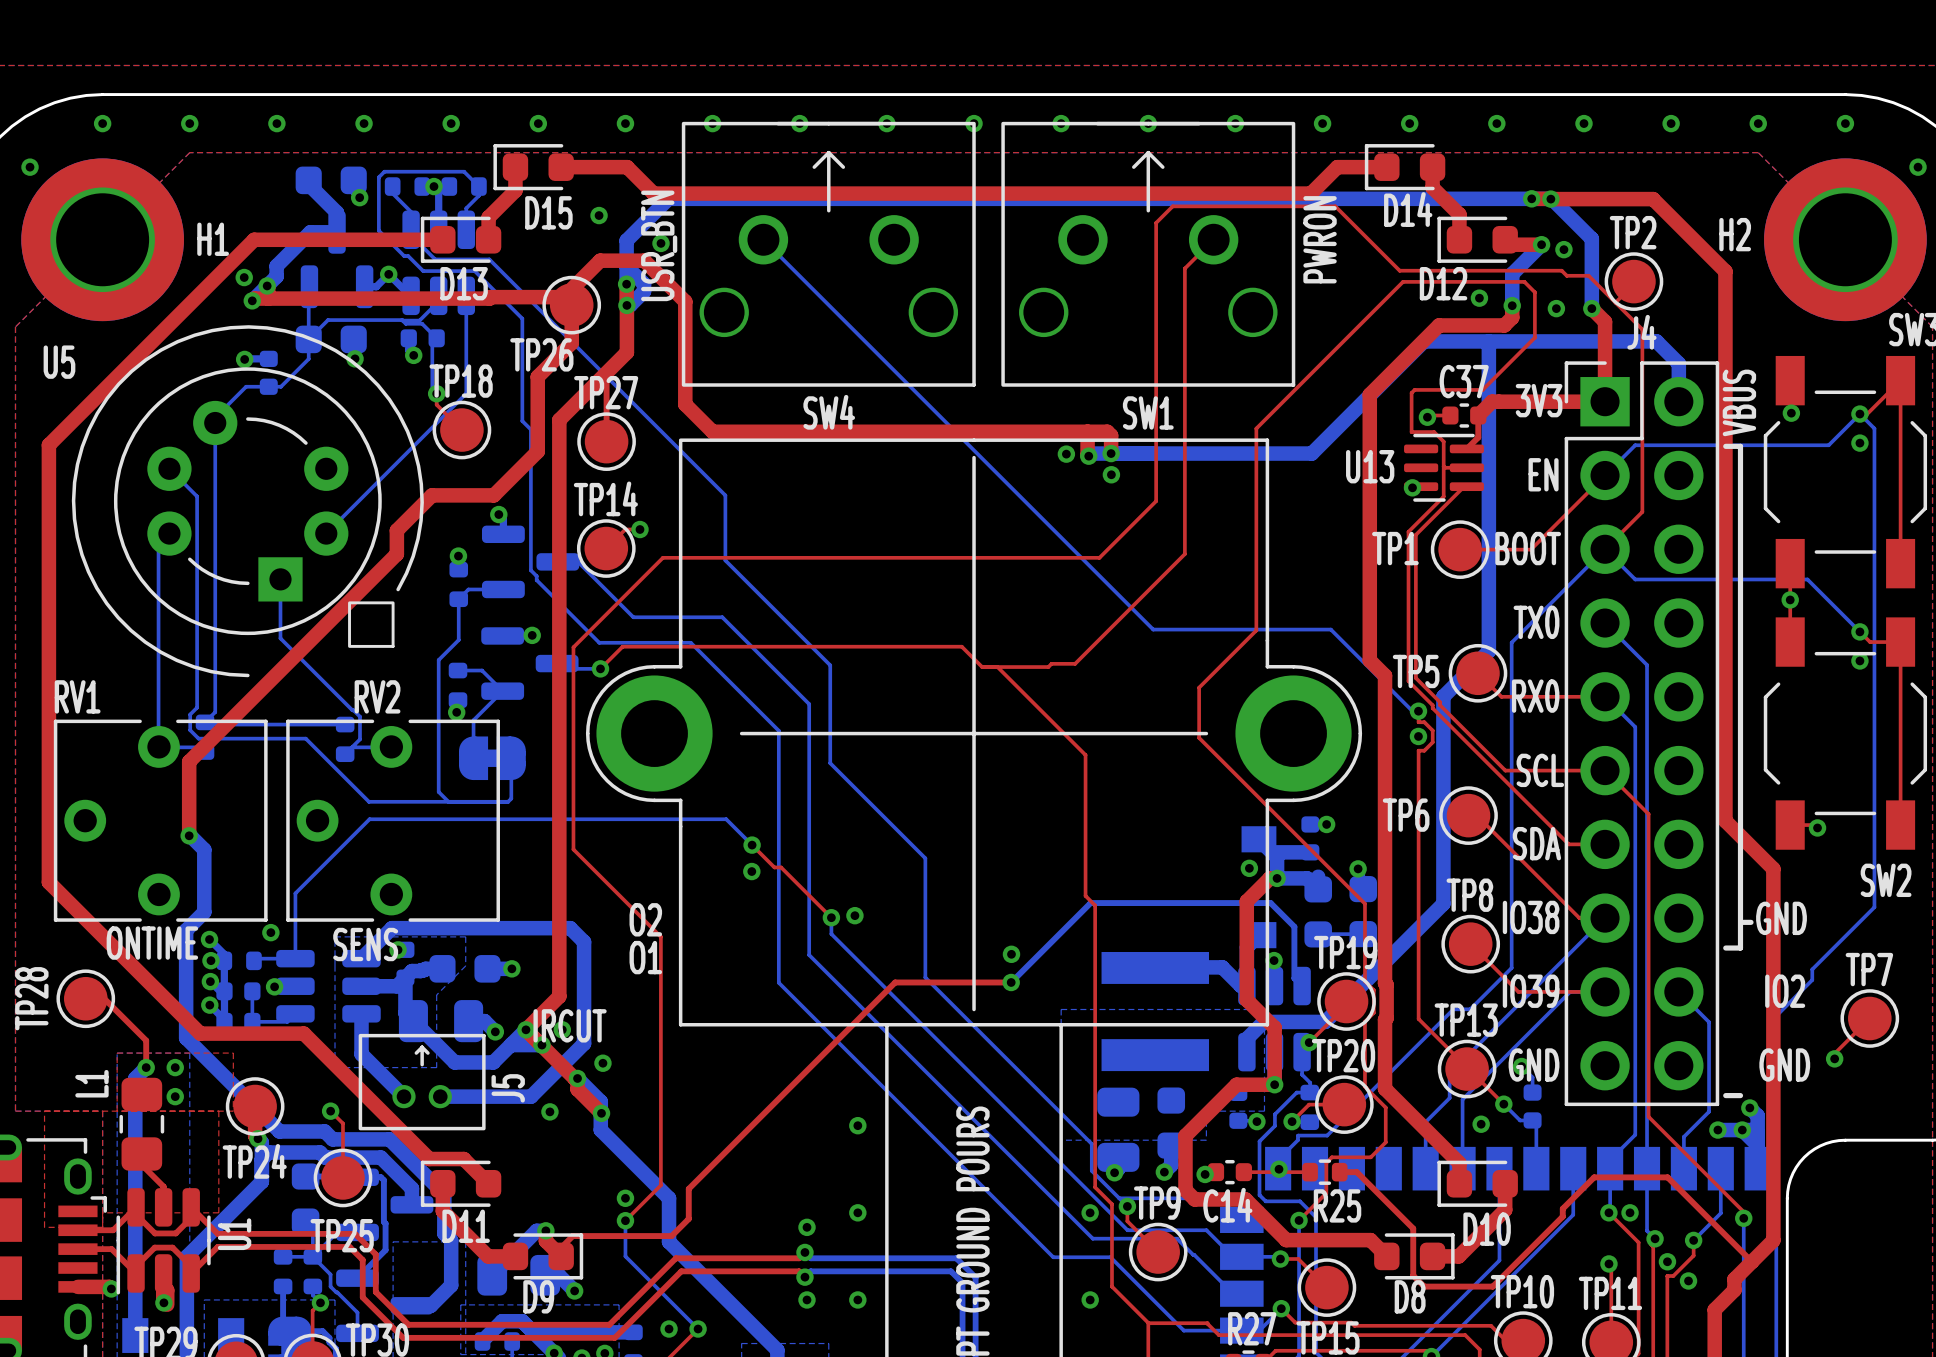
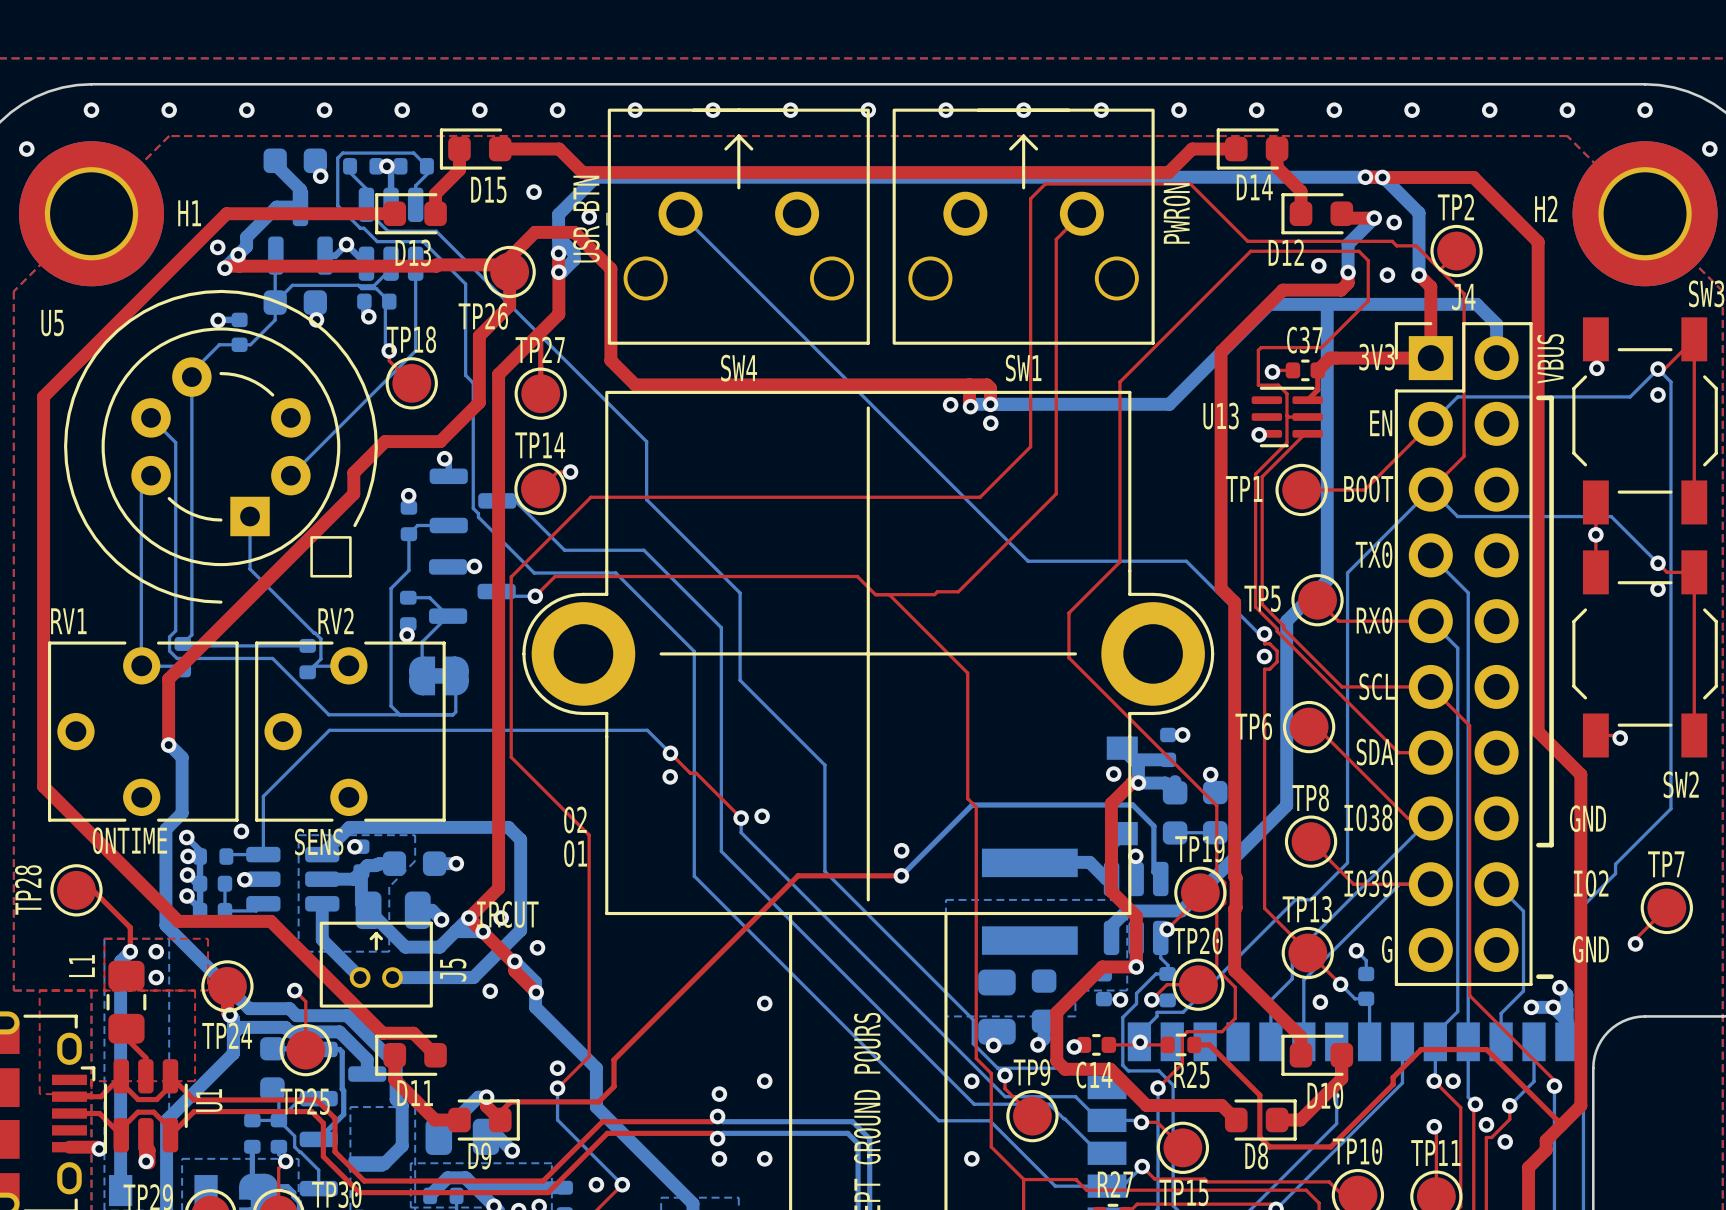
line: (1743, 922) (1751, 922) -> none
text: GND (1534, 1064) -> G (1387, 949)

